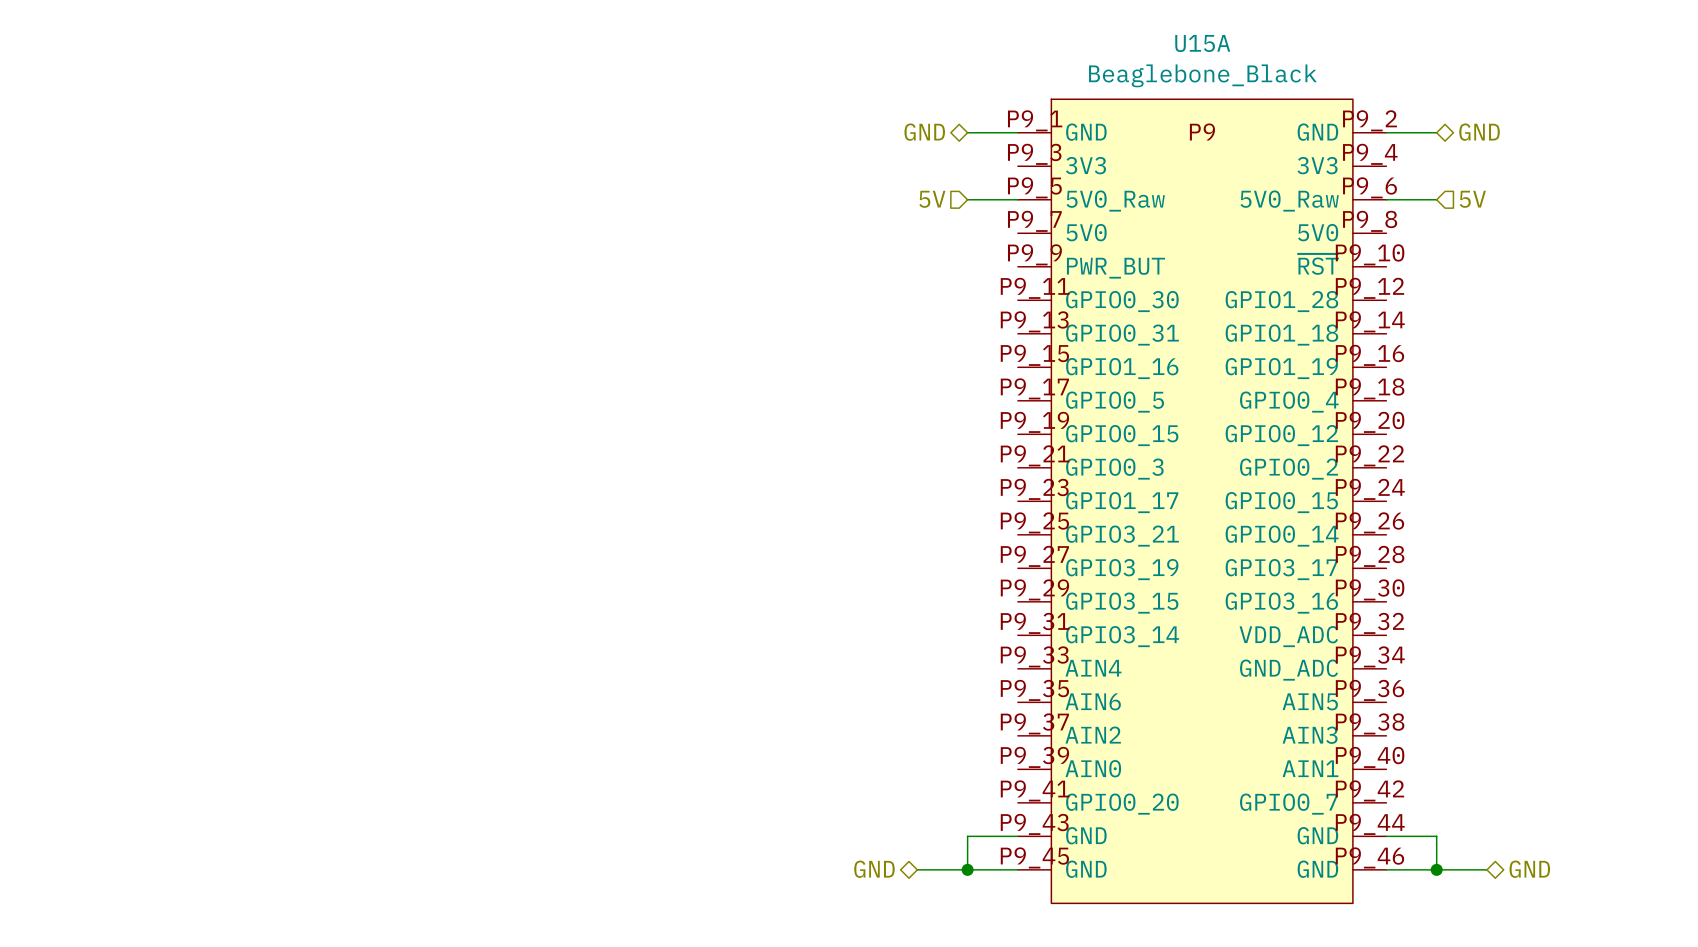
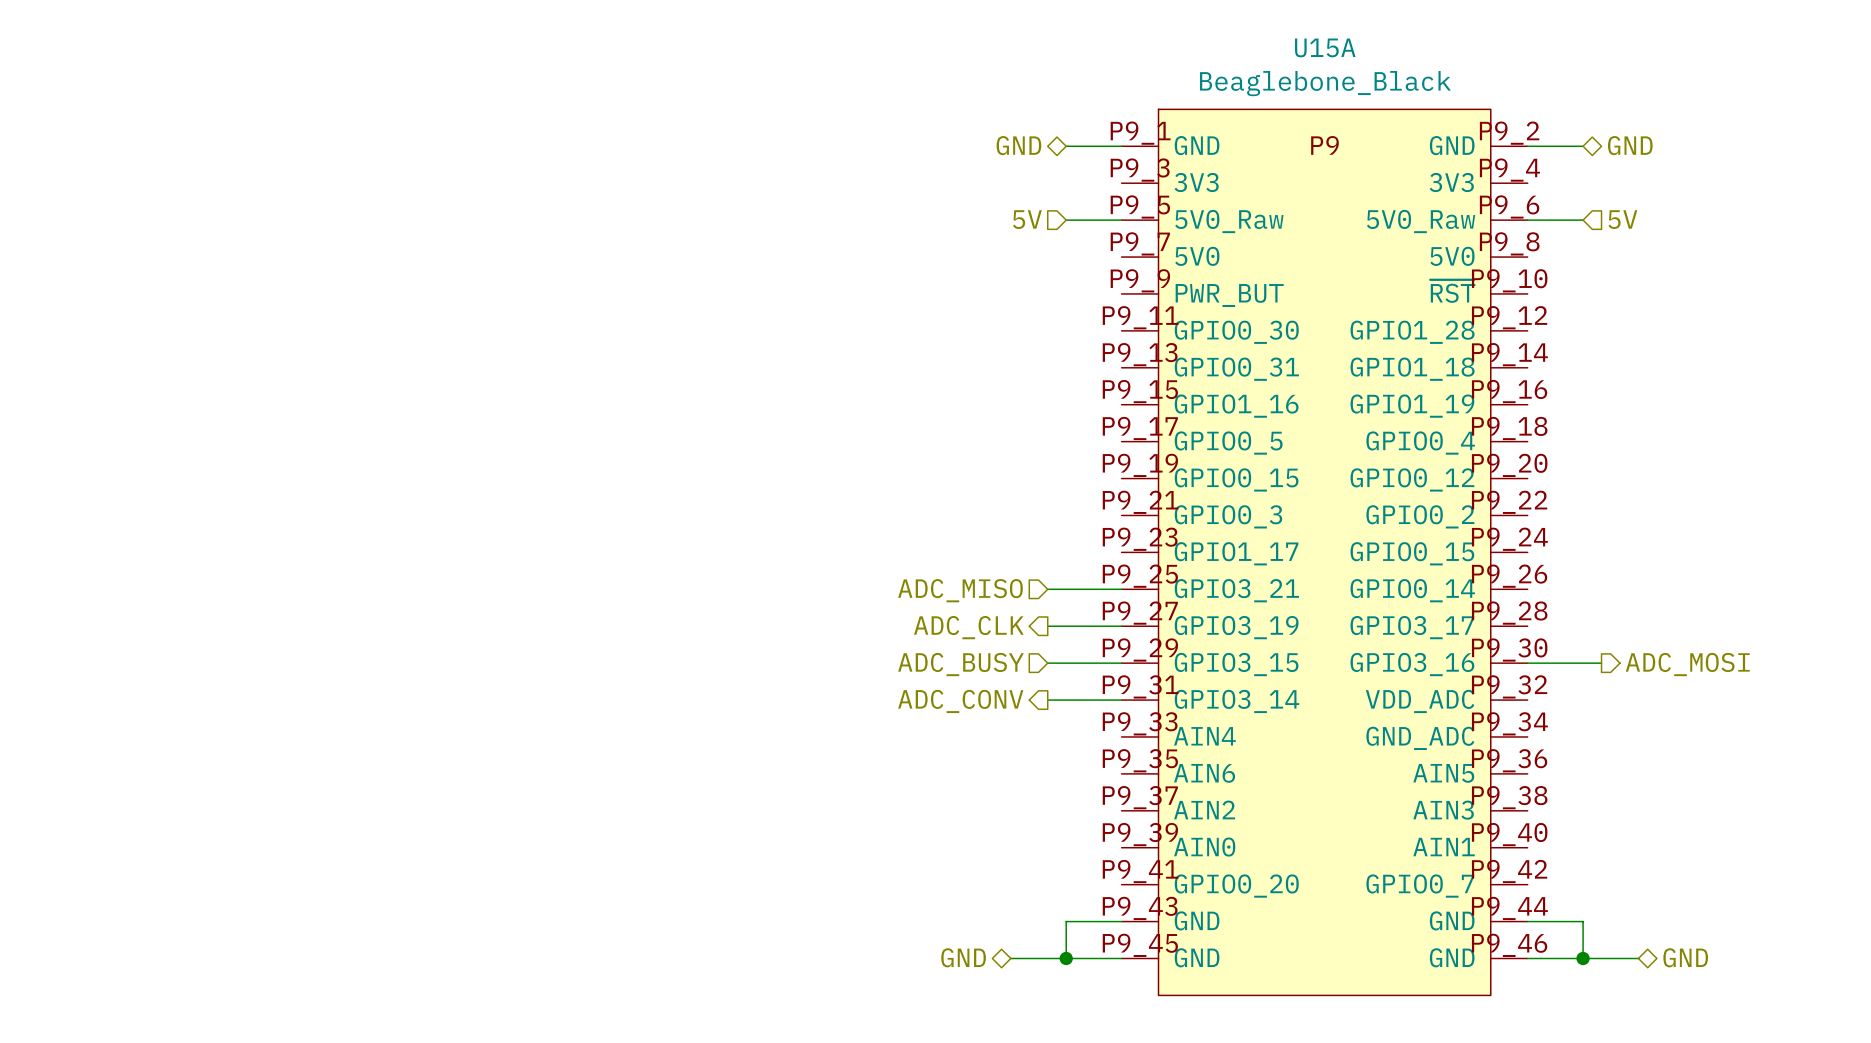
wire: none -> (1047, 589) (1121, 589)
hierarchical label: none -> ADC_MISO (960, 590)
wire: none -> (1047, 626) (1121, 626)
hierarchical label: none -> ADC_CLK (968, 627)
wire: none -> (1047, 663) (1121, 663)
wire: none -> (1527, 663) (1601, 663)
hierarchical label: none -> ADC_BUSY (961, 664)
hierarchical label: none -> ADC_MOSI (1687, 664)
wire: none -> (1047, 700) (1121, 700)
hierarchical label: none -> ADC_CONV (960, 701)

